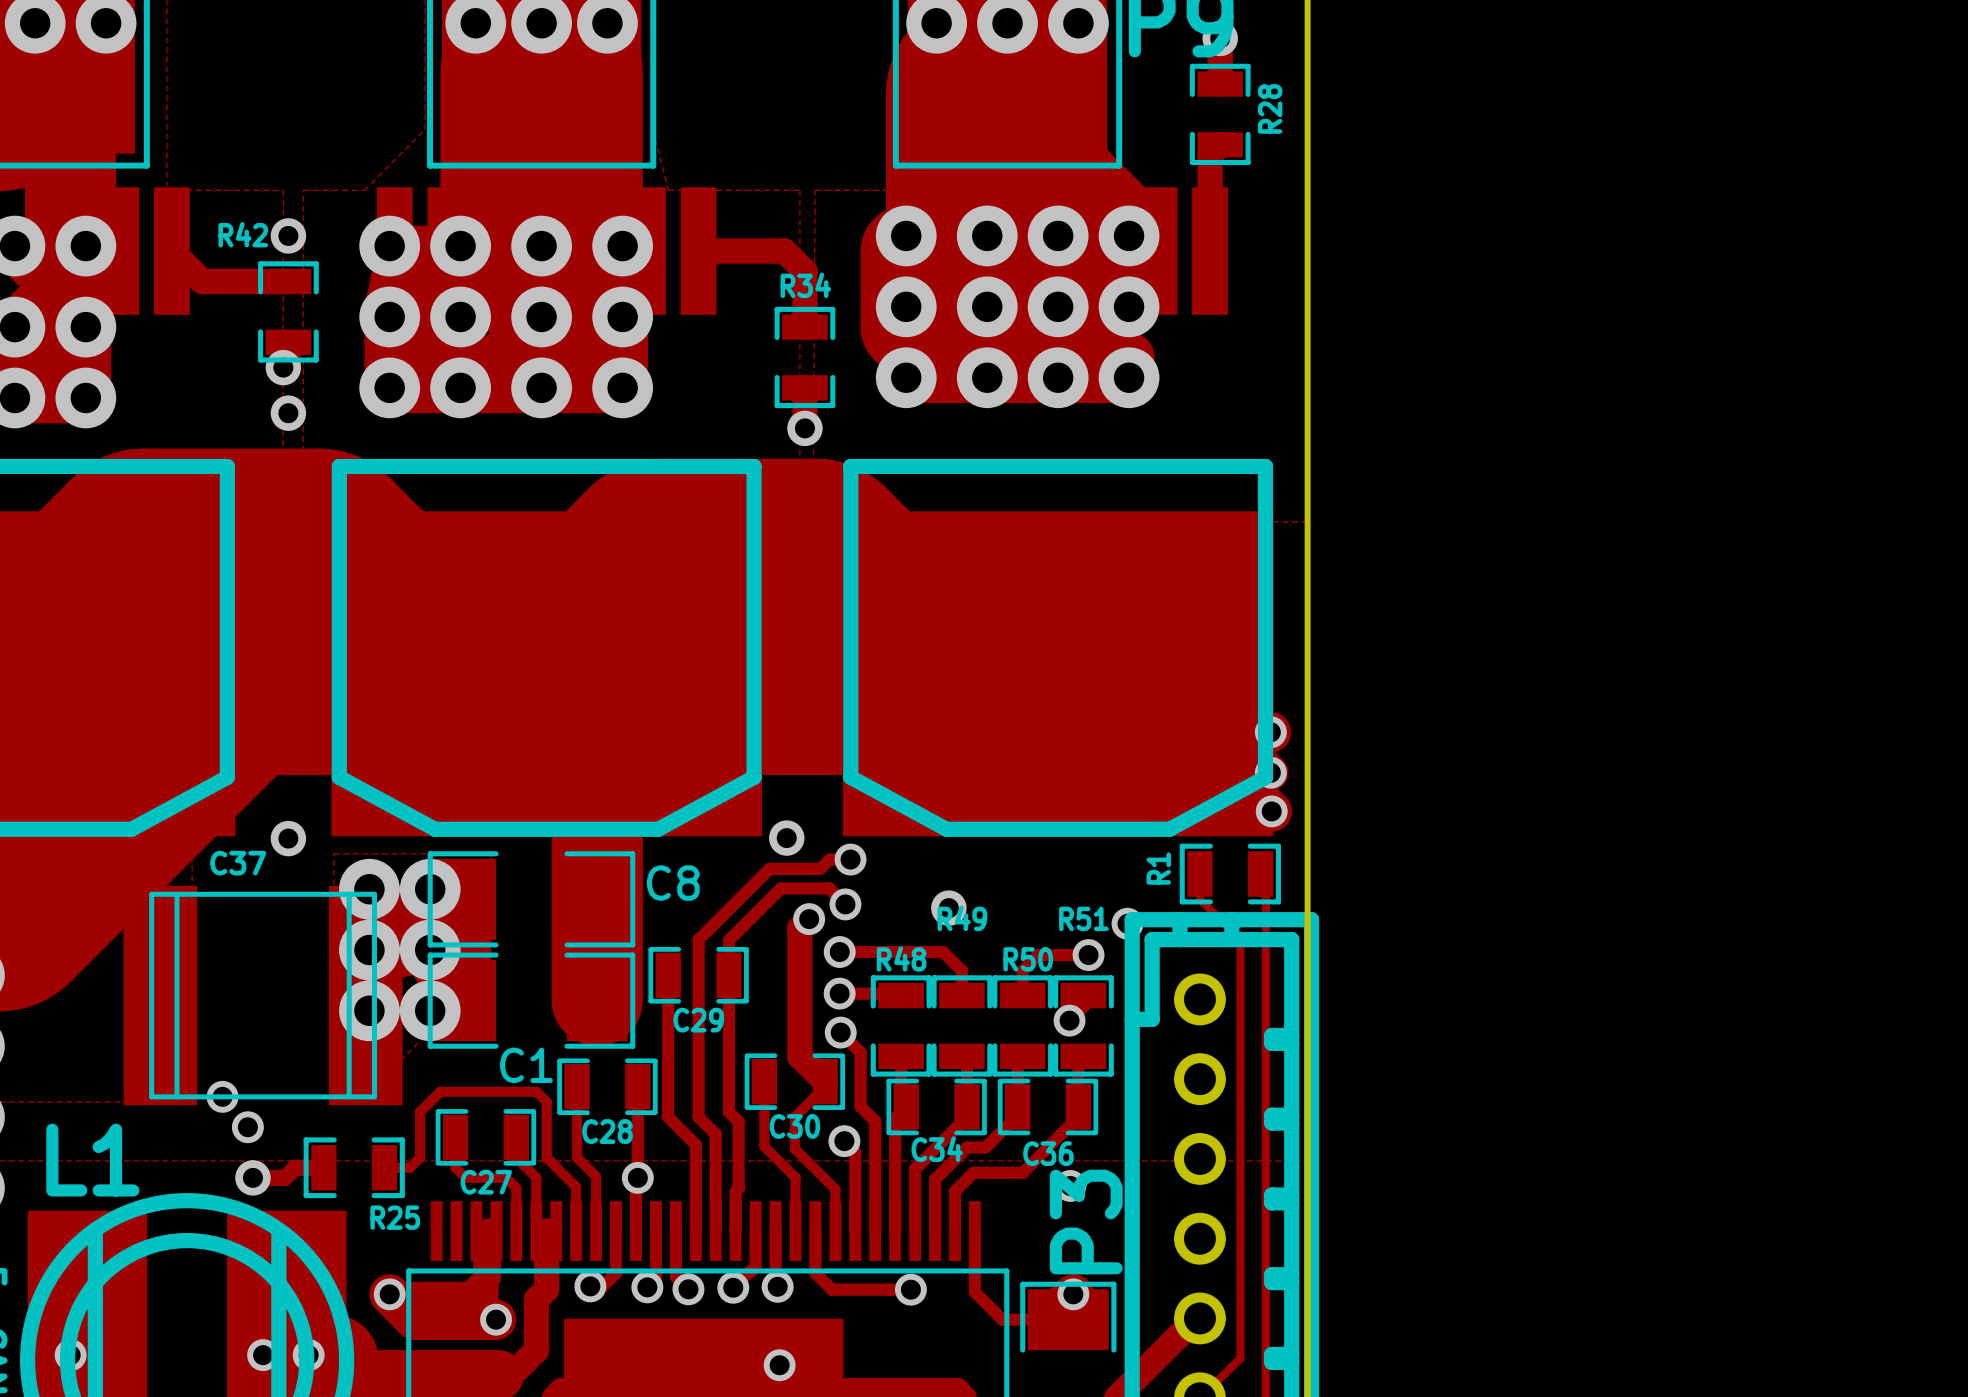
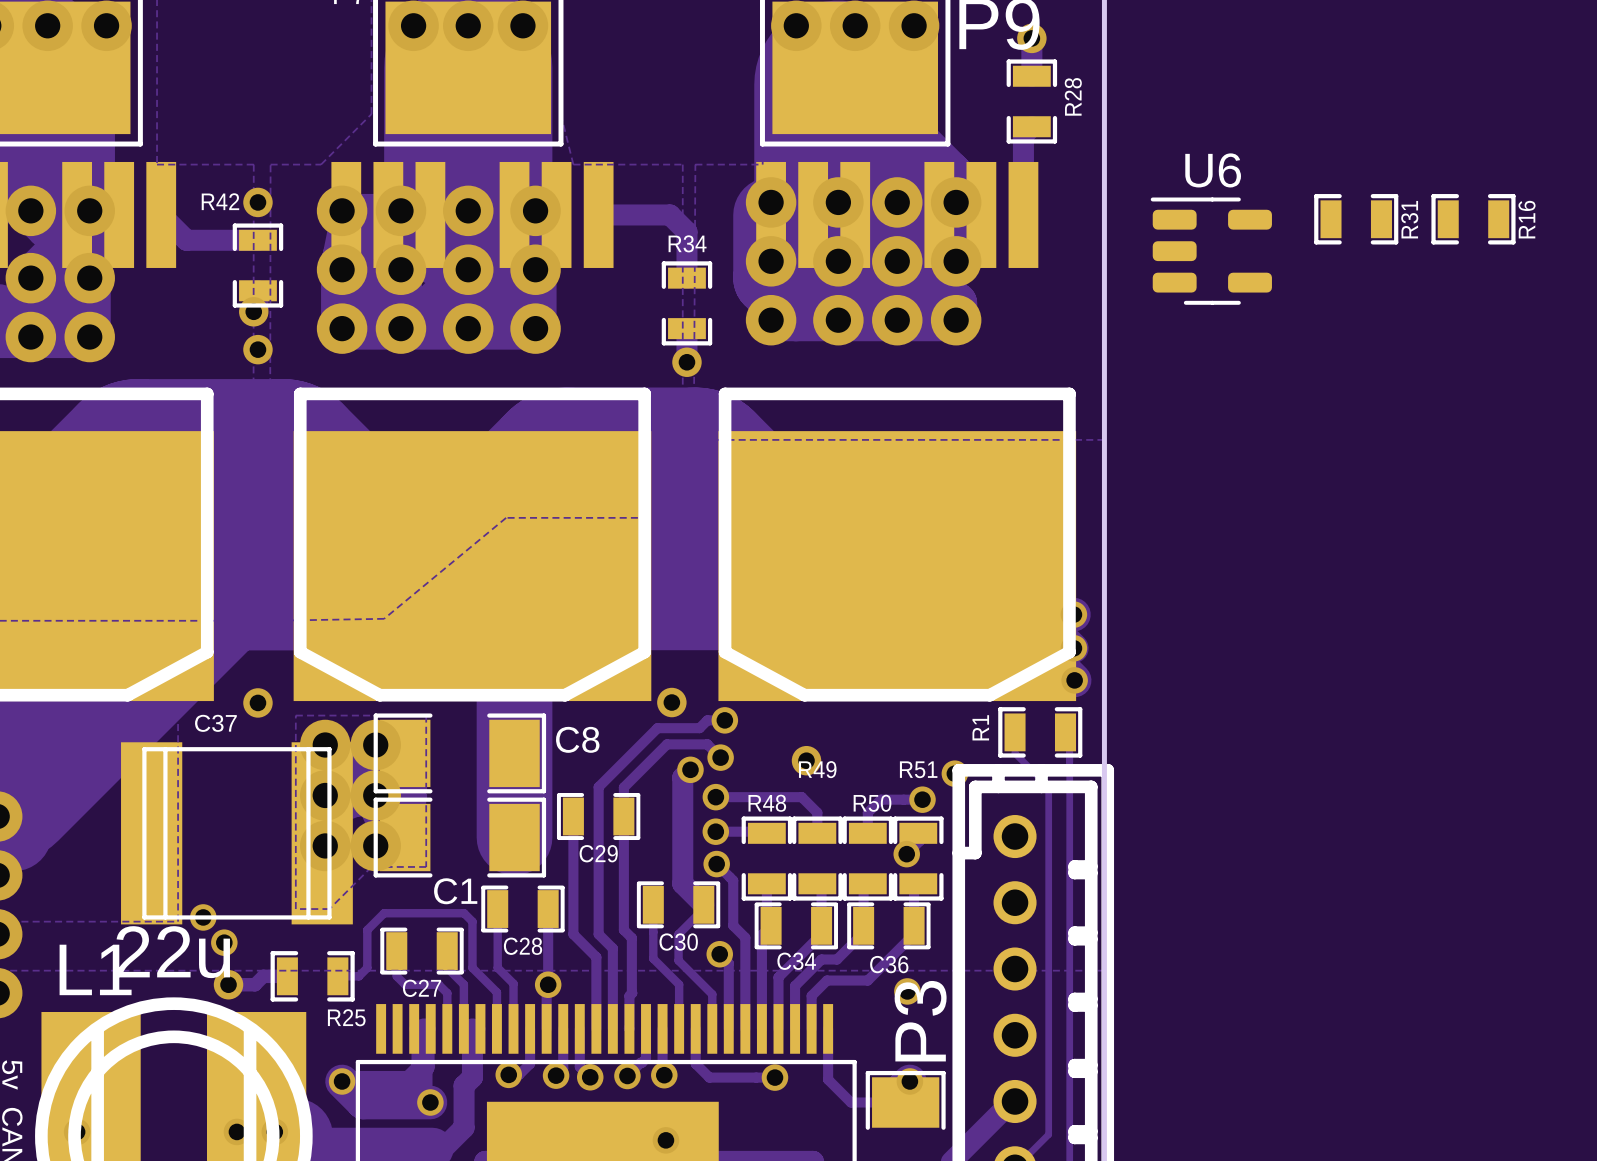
R31: none -> (1356, 219)
R16: none -> (1473, 219)
U6: none -> (1211, 251)
L1 value: none -> 22u (173, 952)

